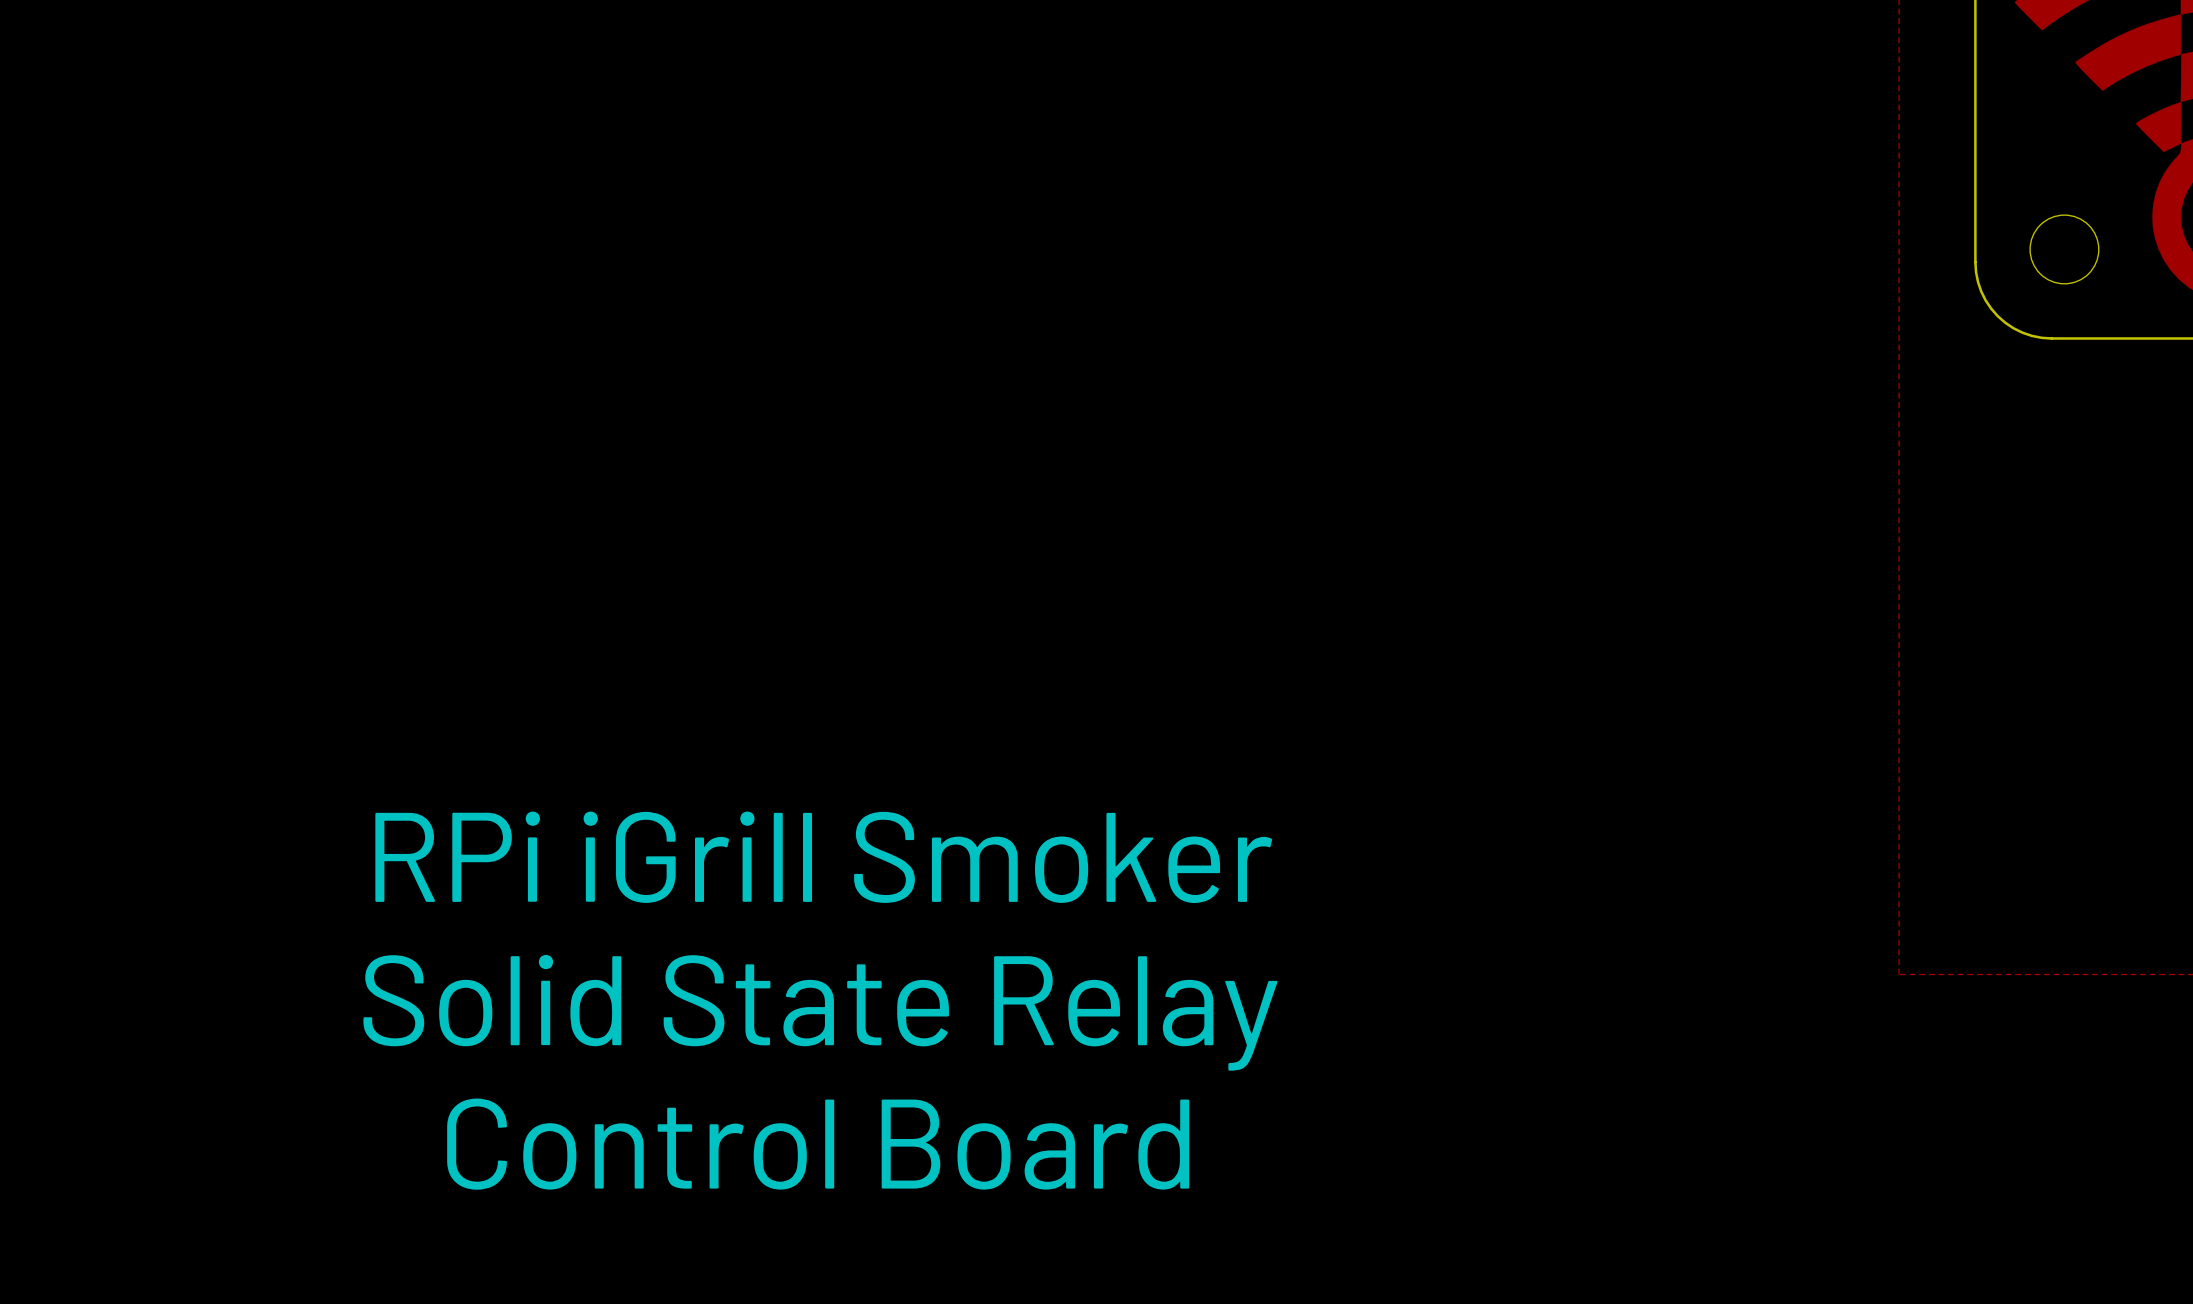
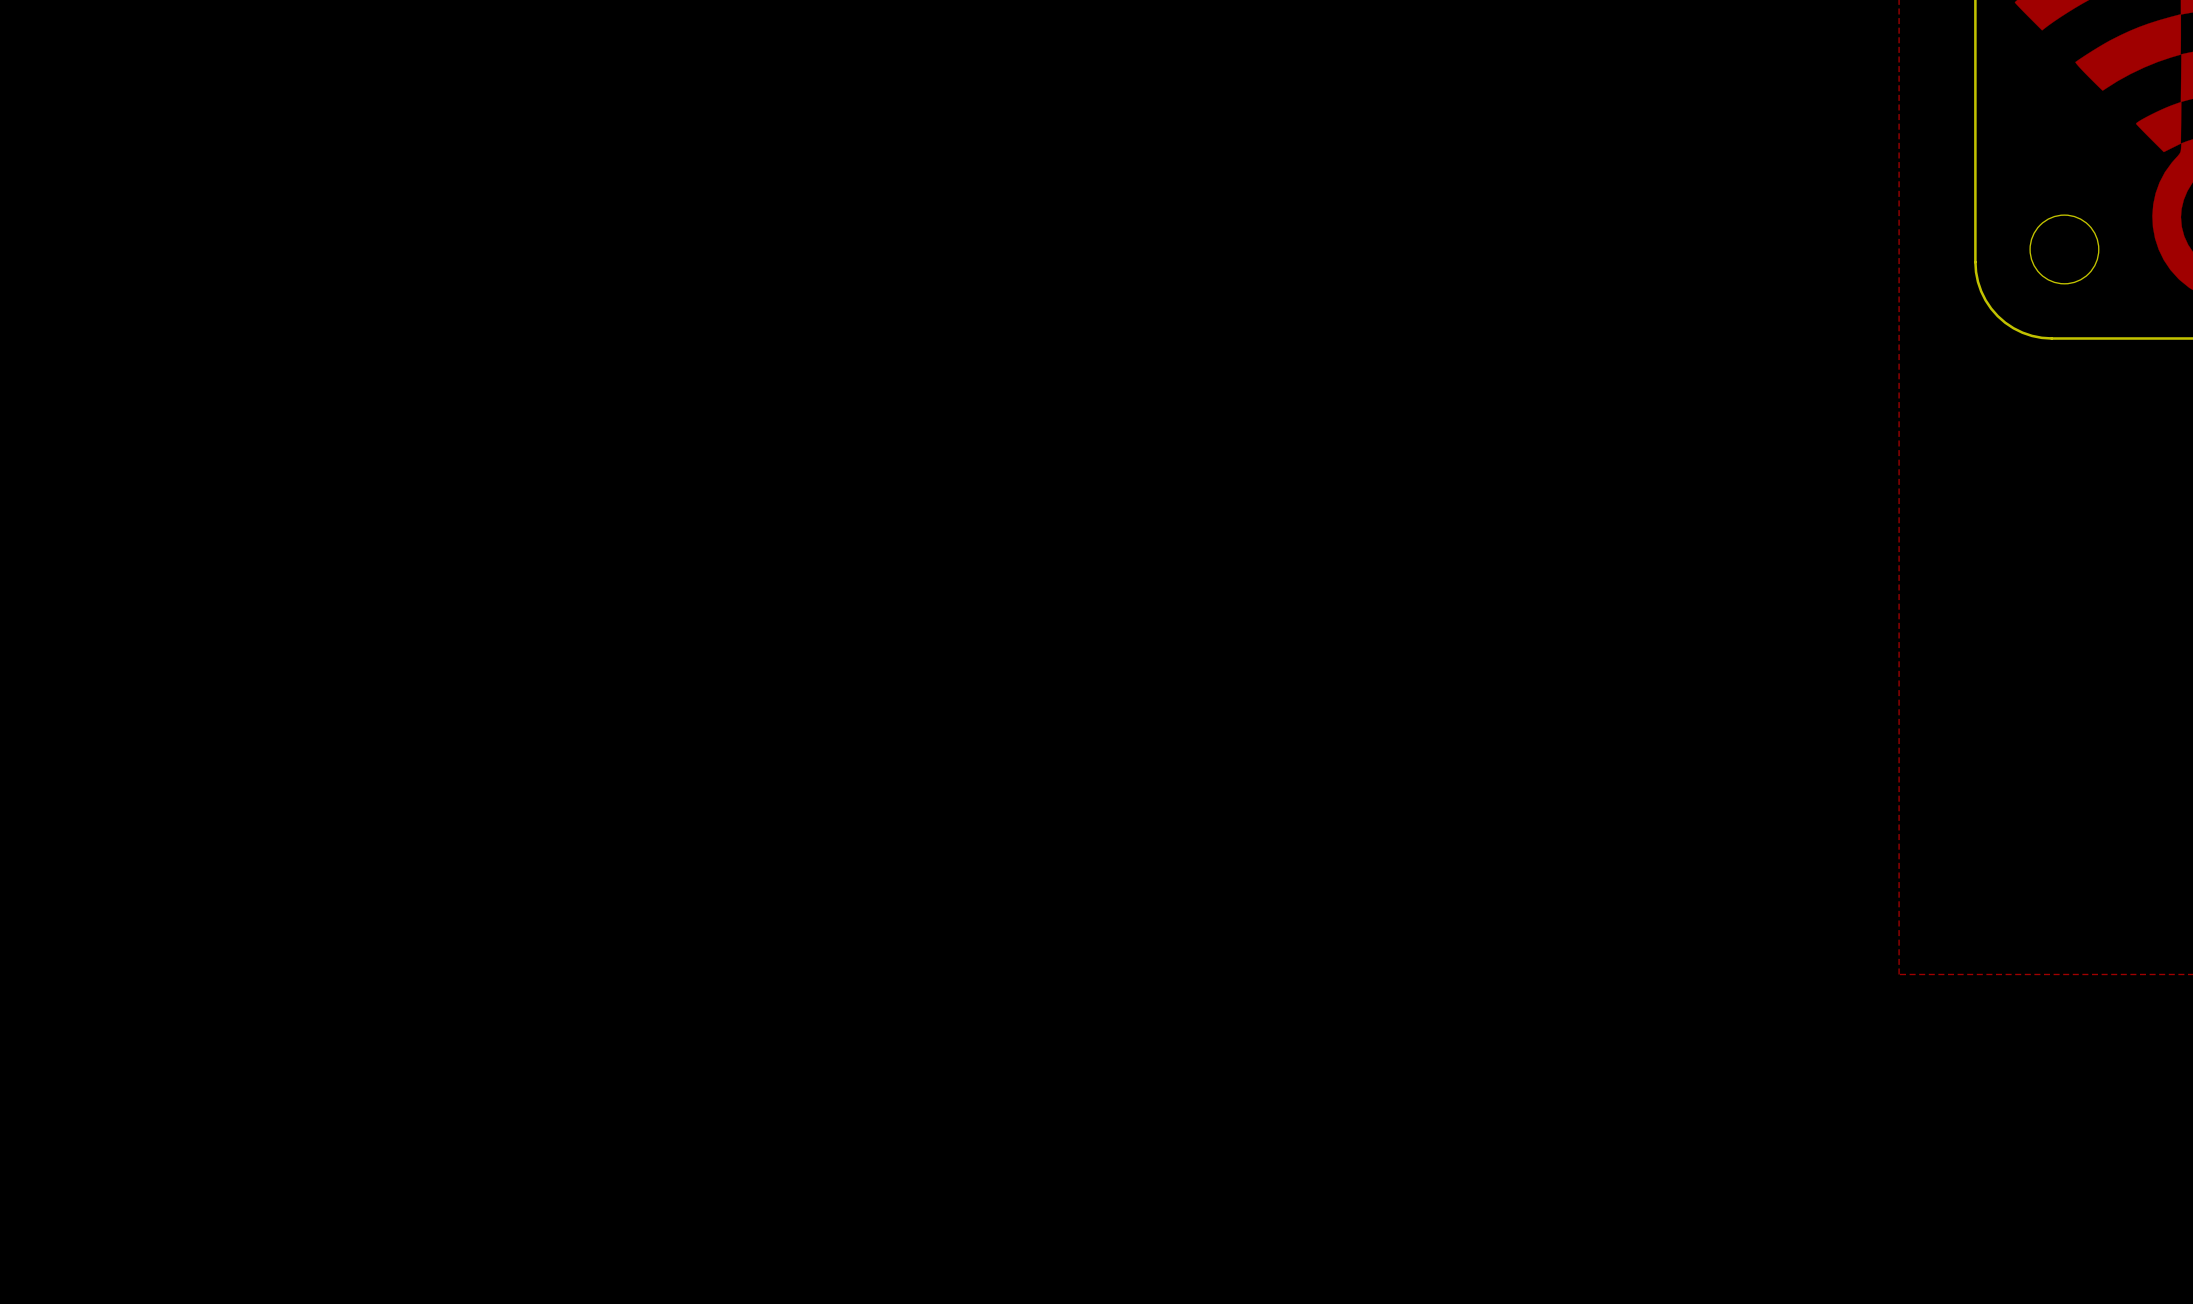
text: RPi iGrill Smoker (823, 857) -> none
text: Solid State Relay (820, 1012) -> none
text: Control Board (818, 1144) -> none

